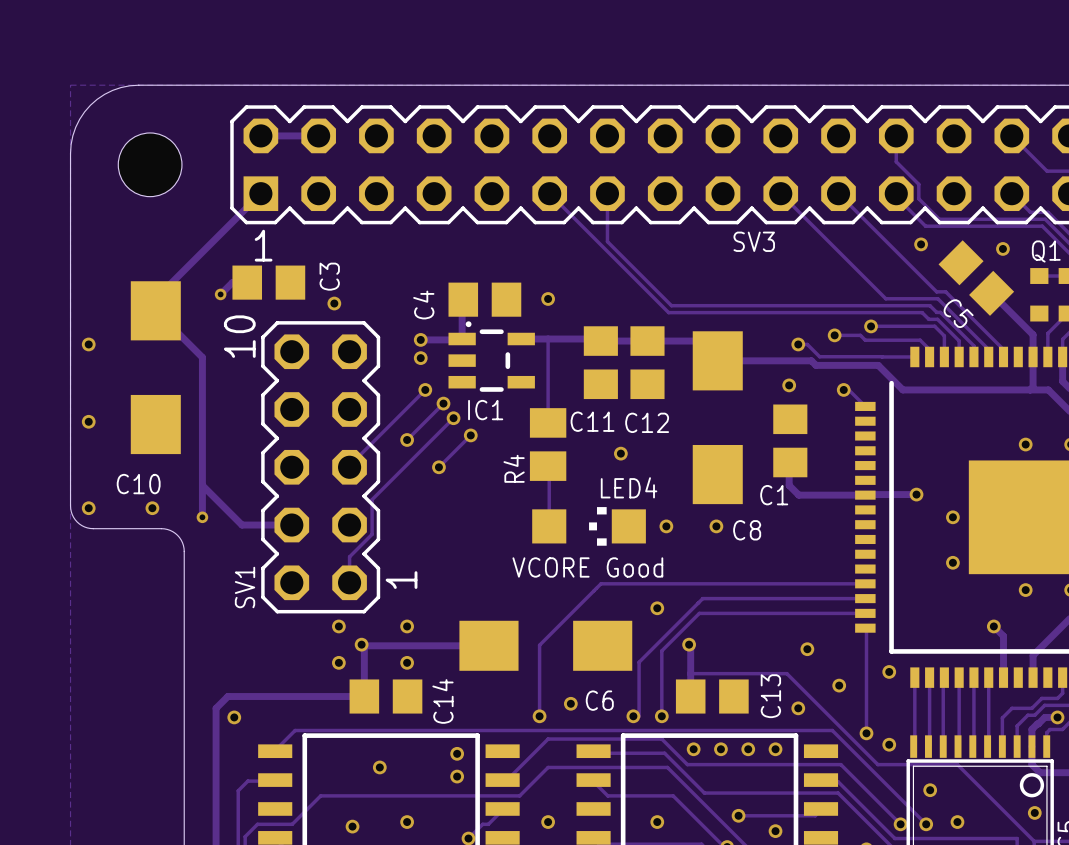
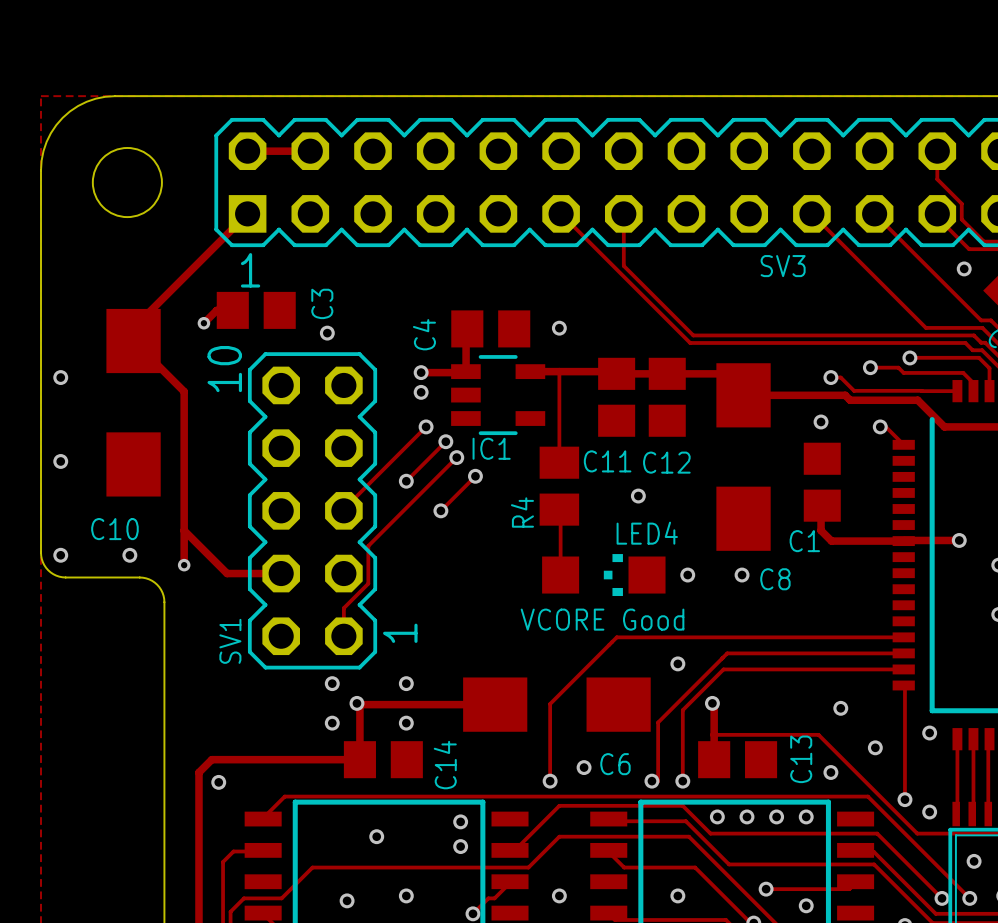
IC1 footprint: [448, 321, 535, 392] -> [451, 355, 546, 436]

